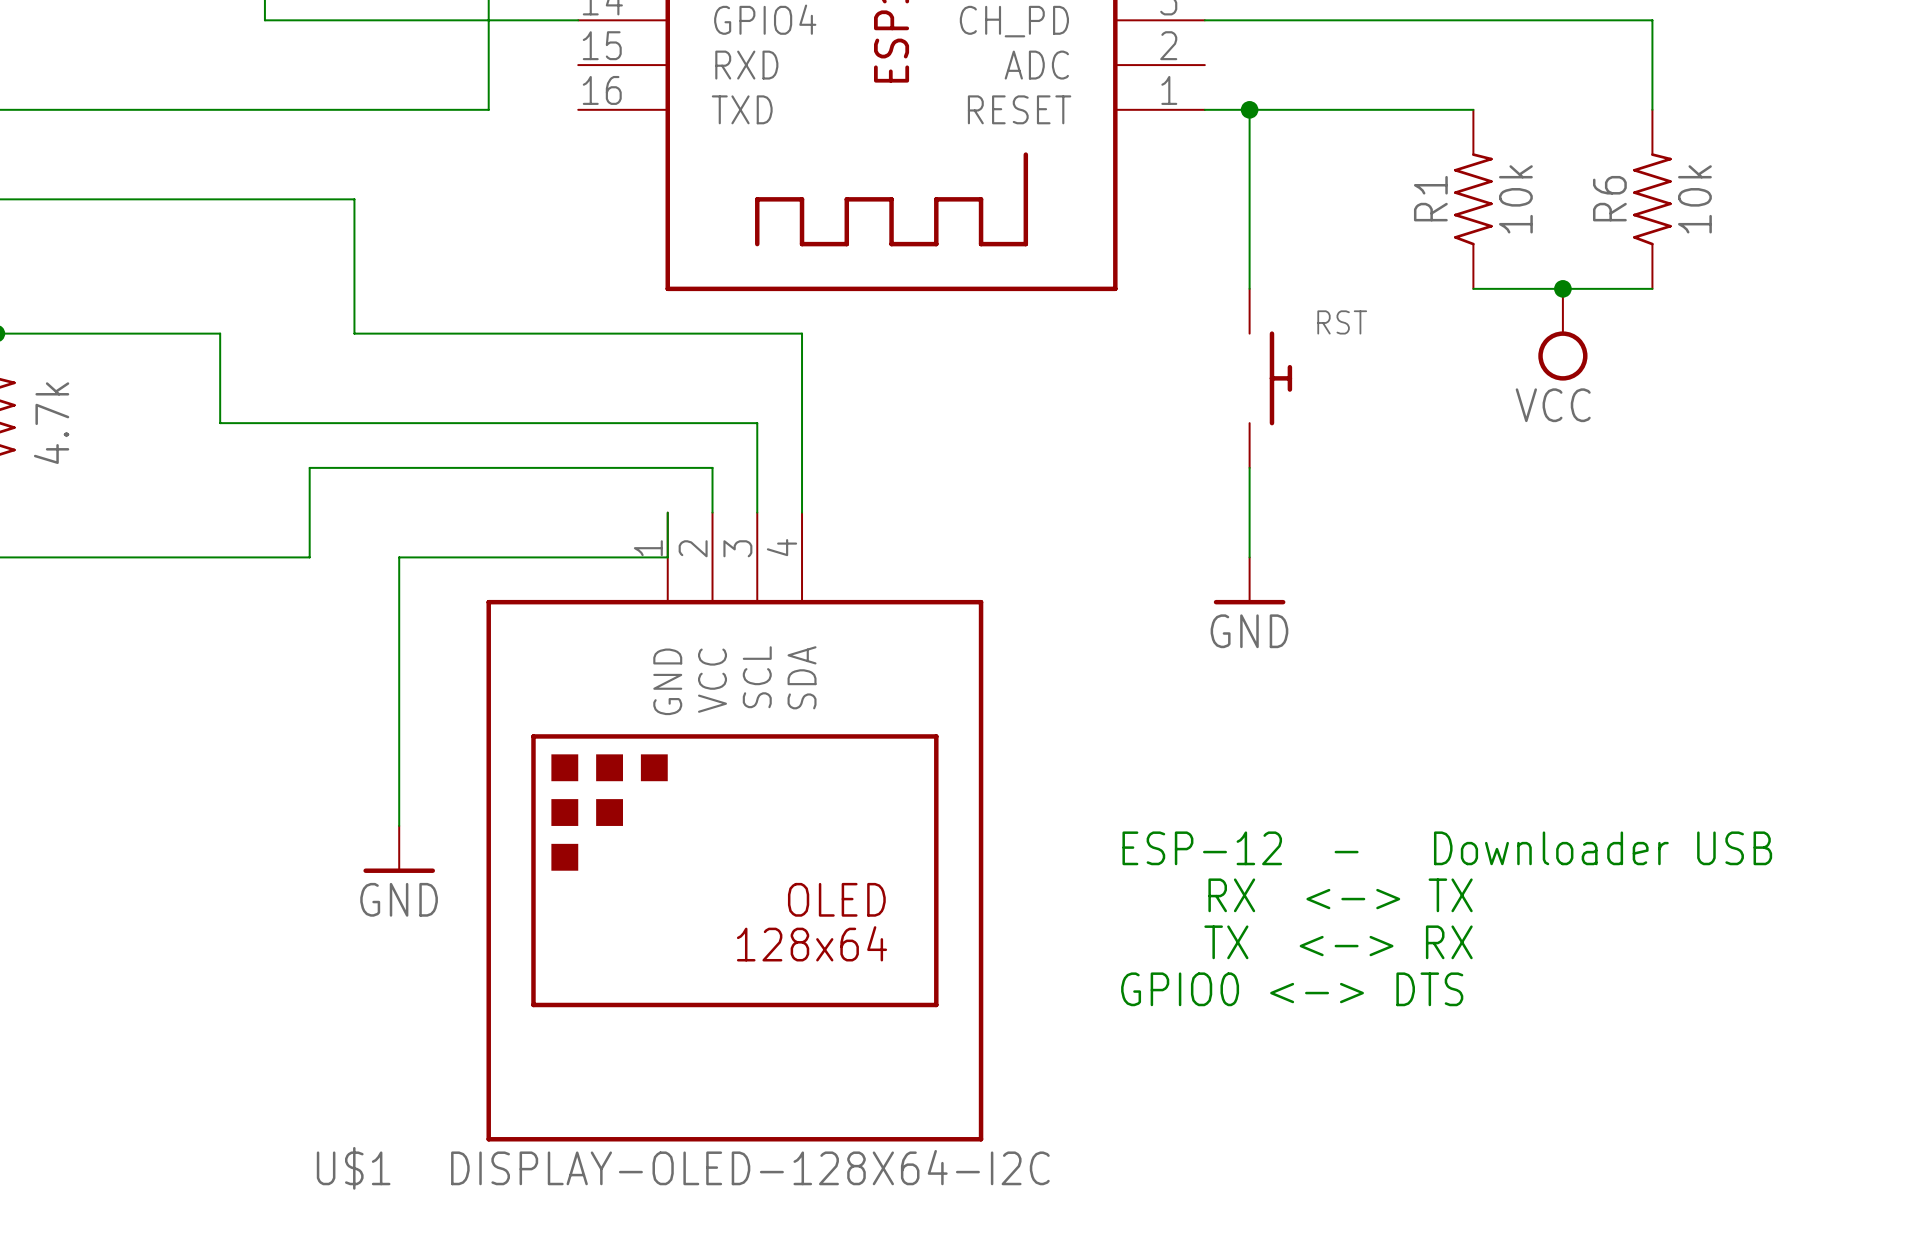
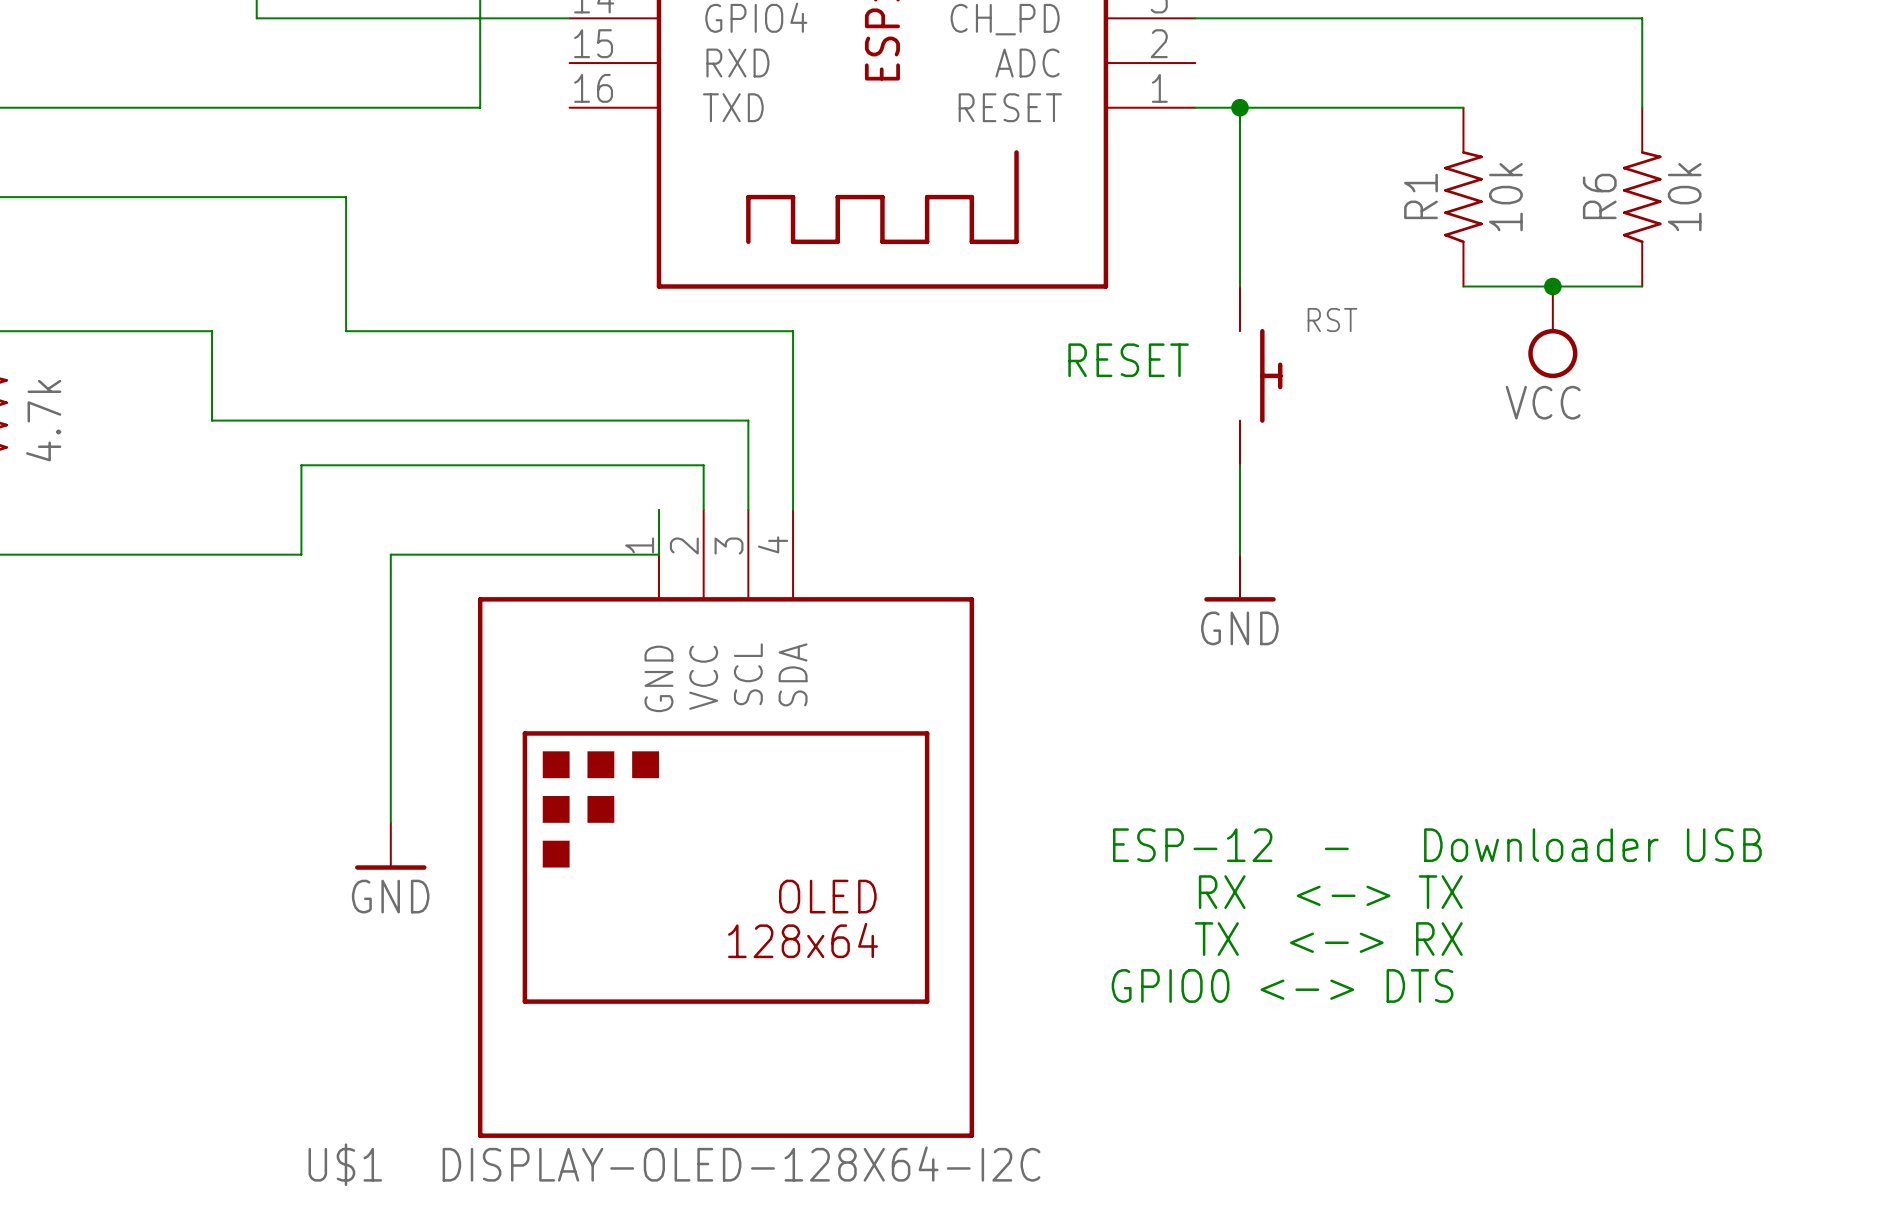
text: none -> RESET (1128, 360)

